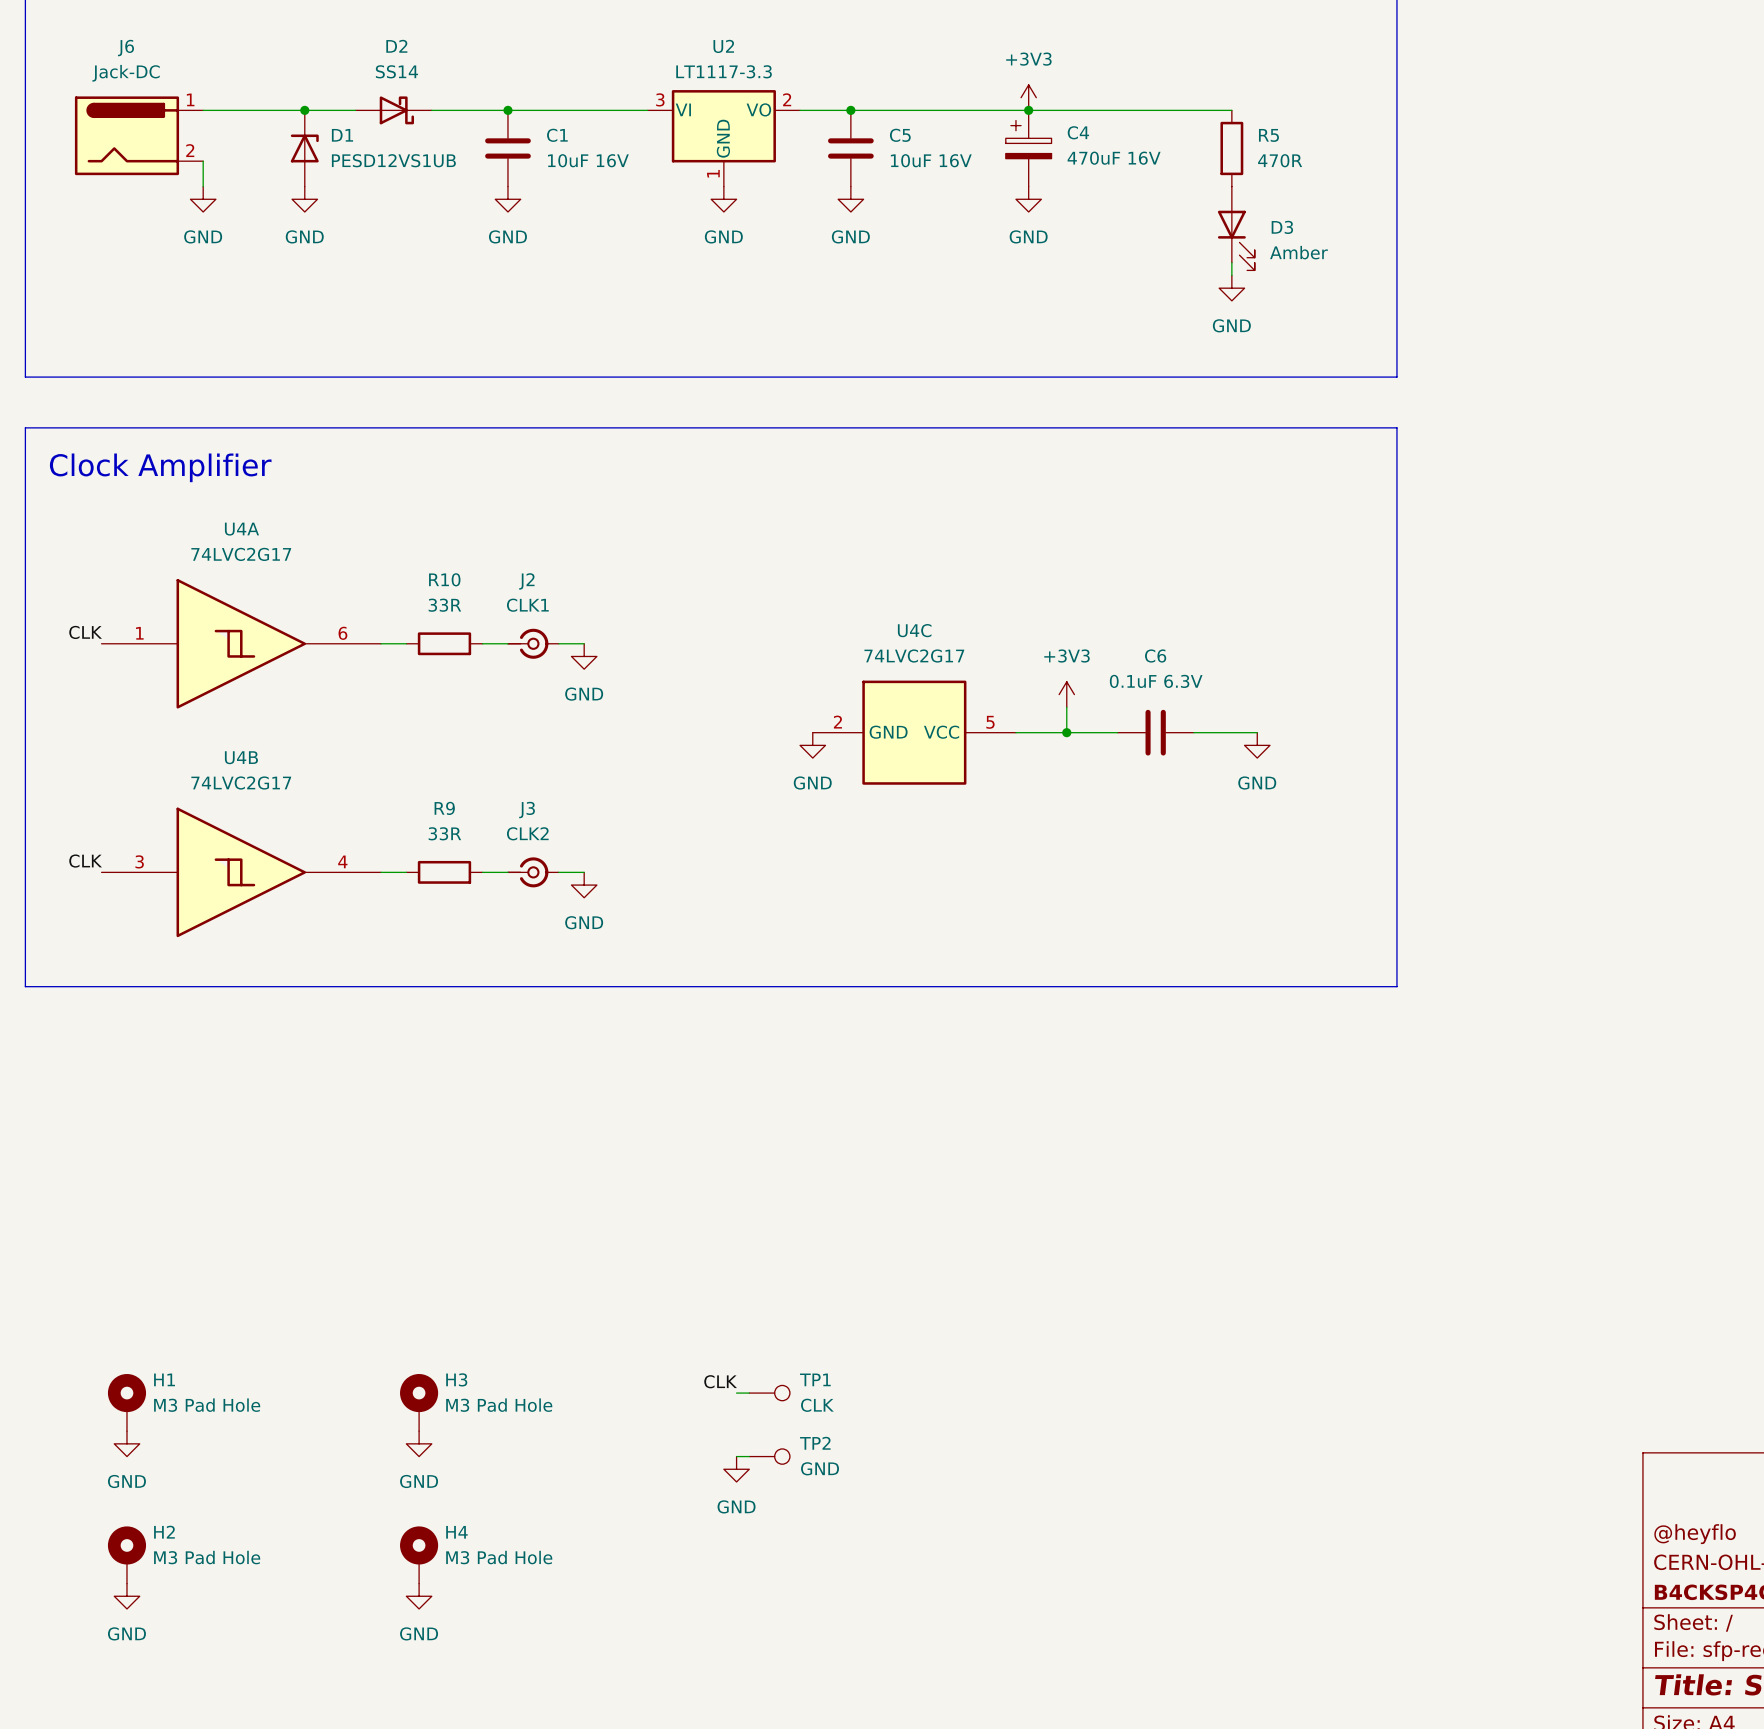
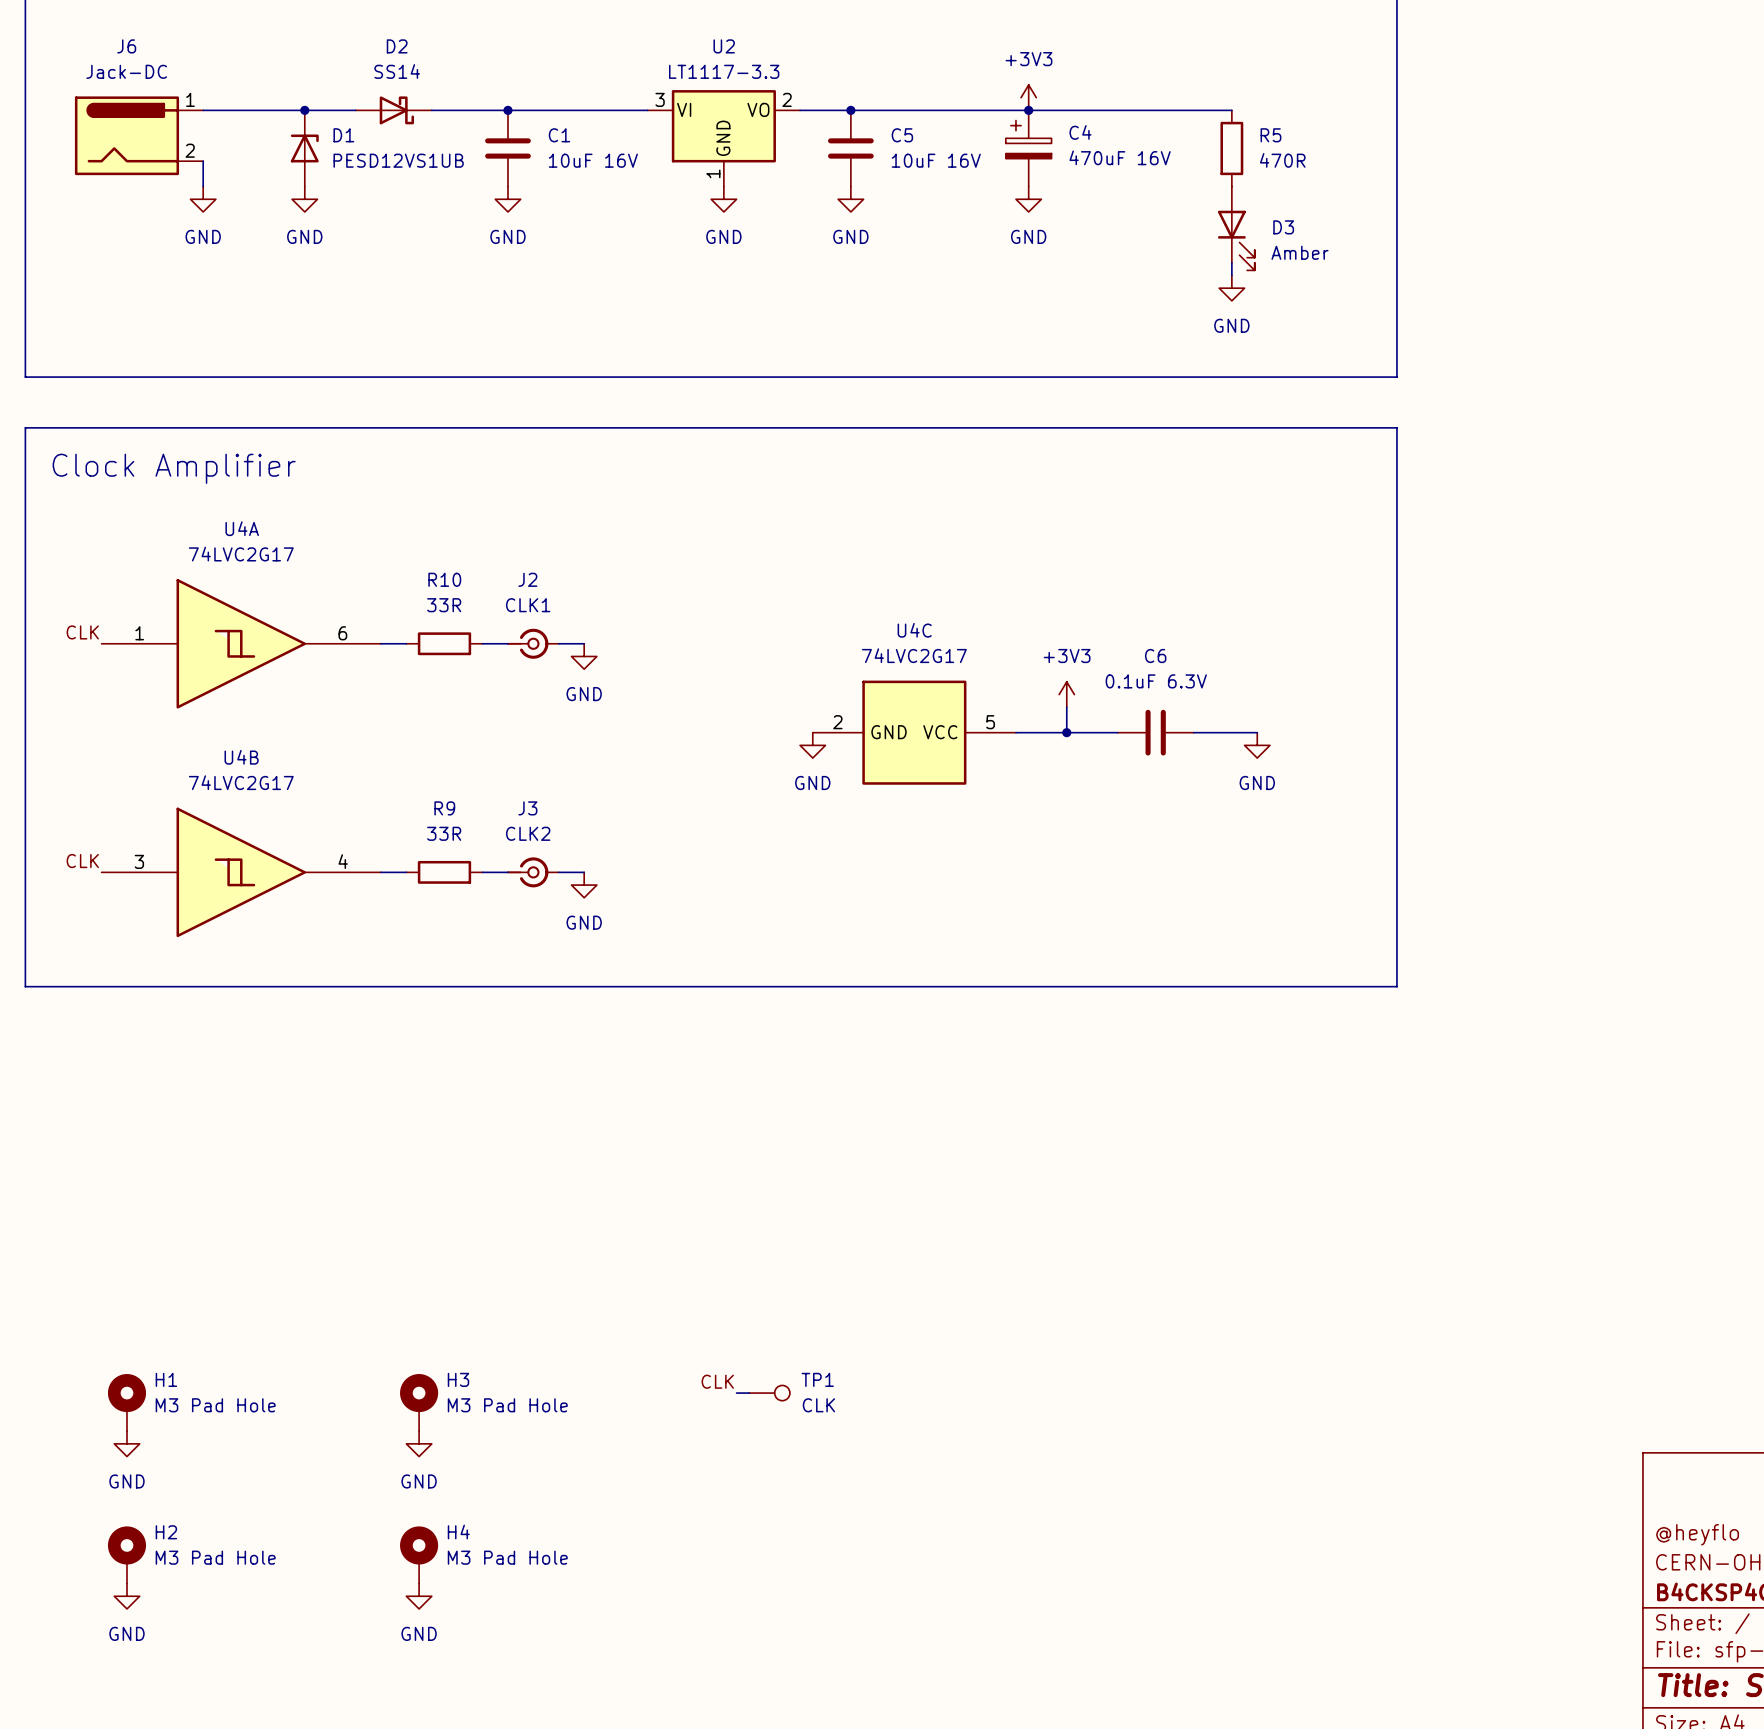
wire: (736, 1456) (749, 1456) -> none
TP2: GND (769, 1456) -> none
power symbol: GND (736, 1469) -> none

